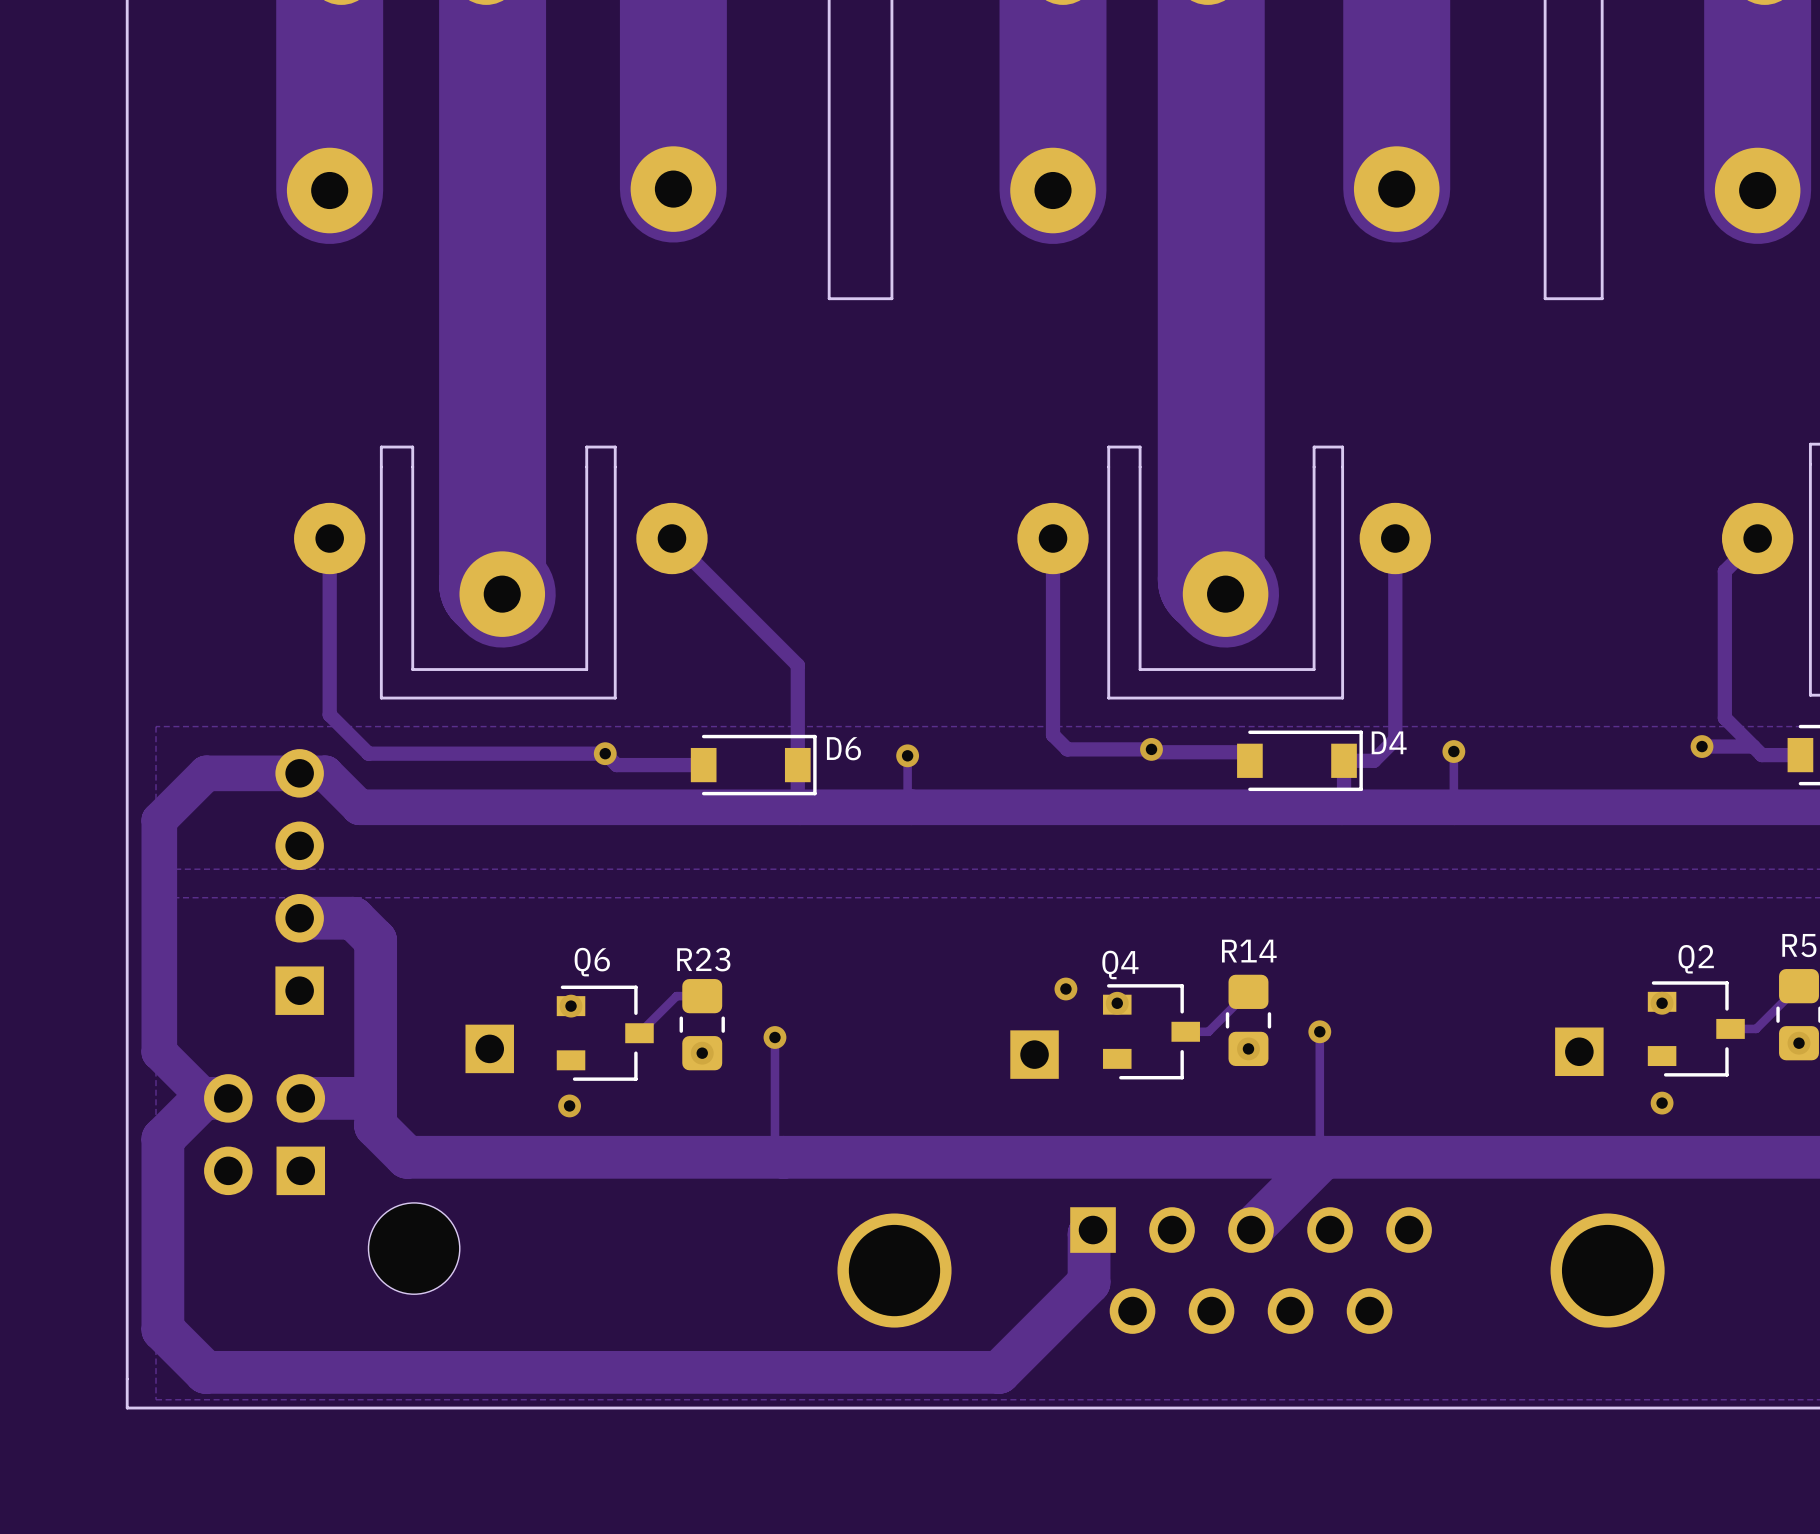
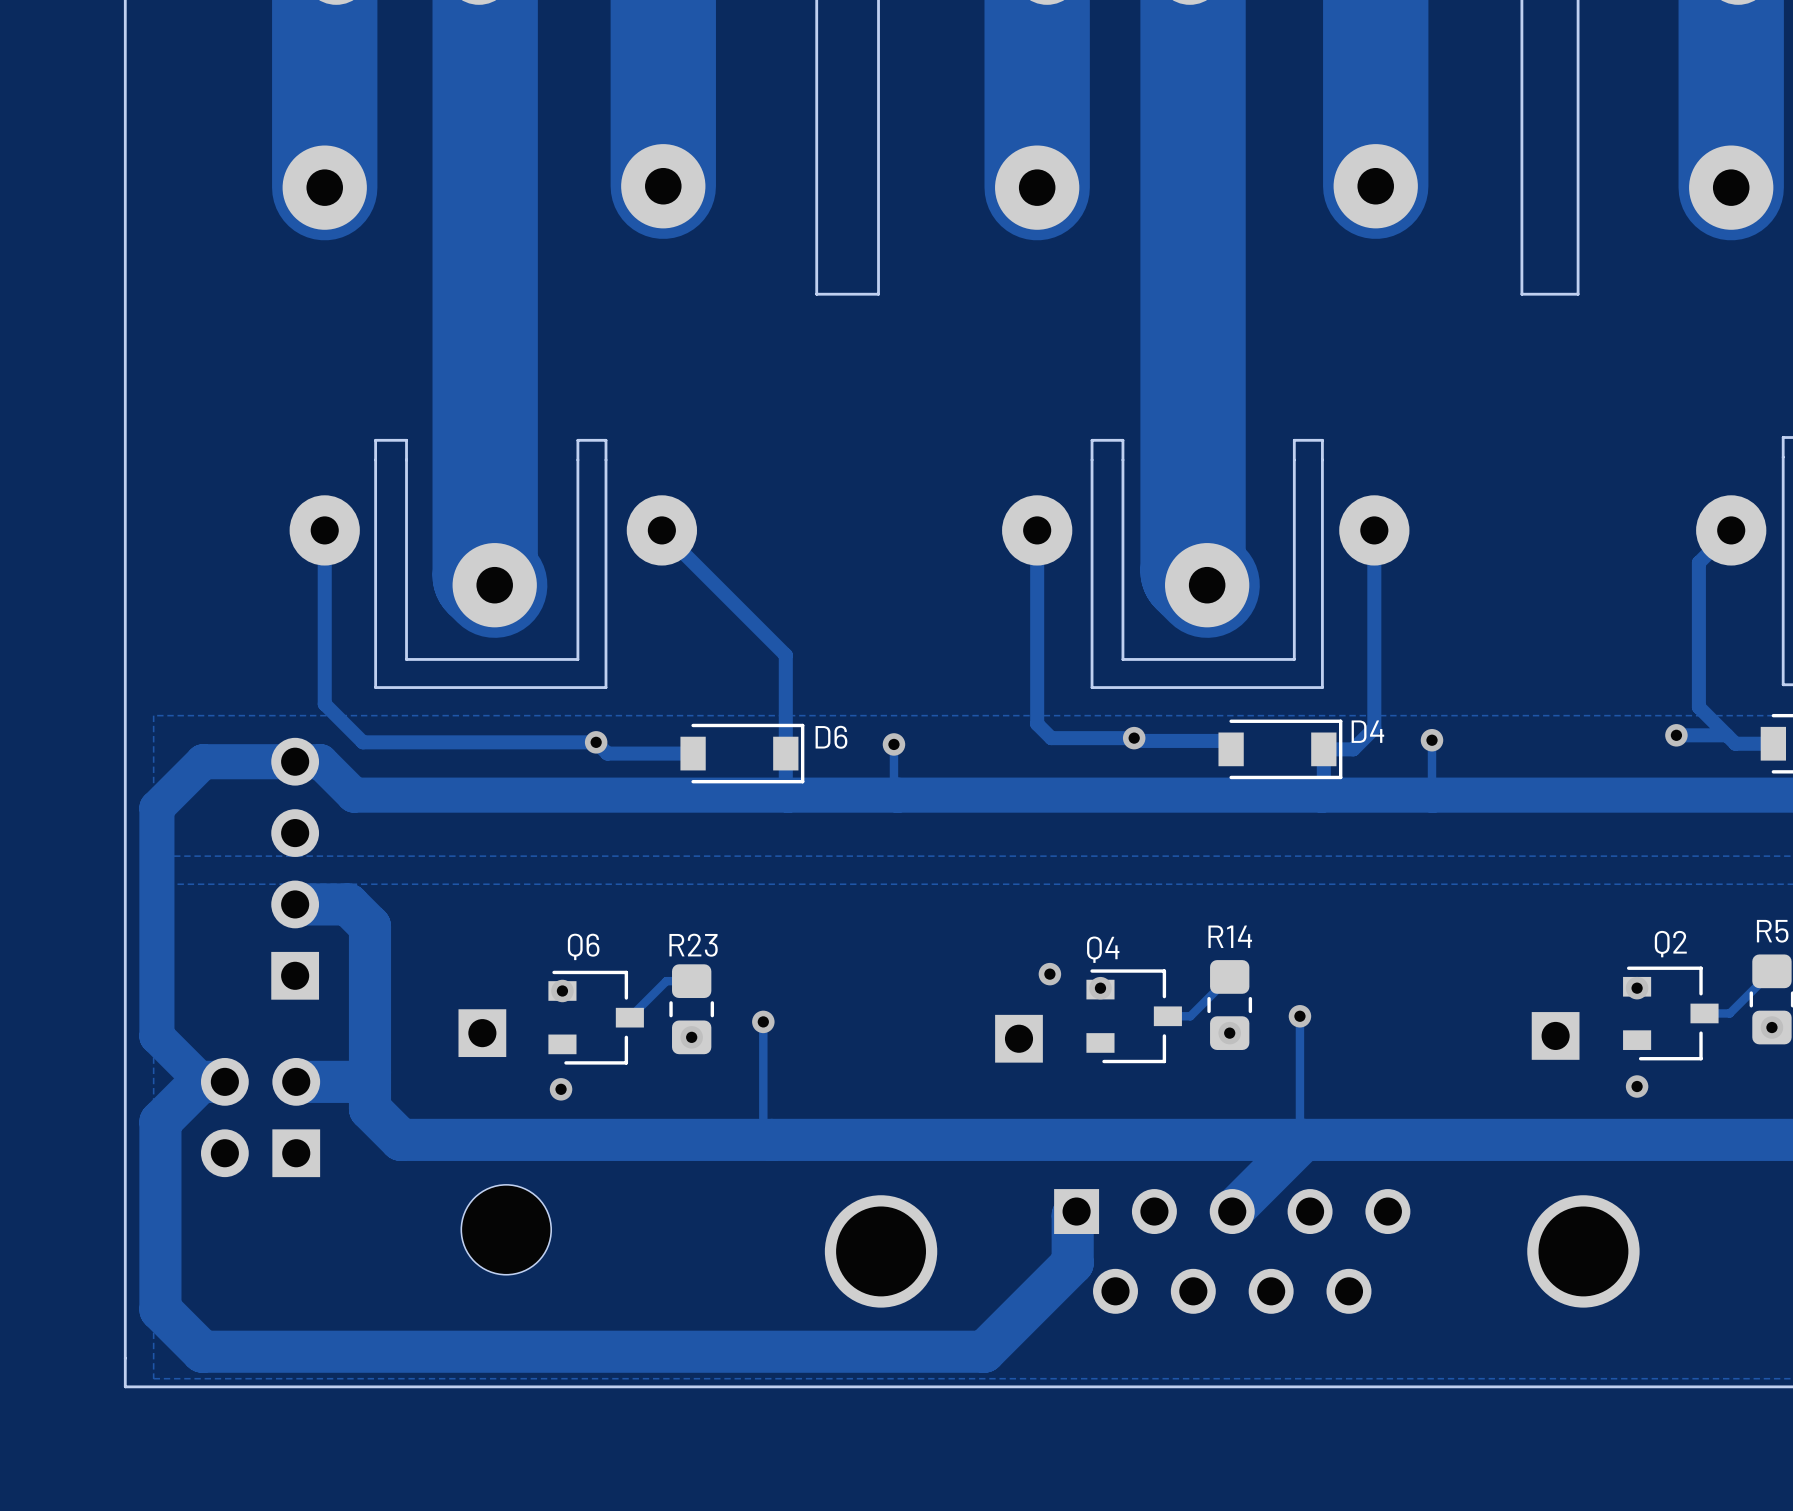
part position: (414, 1248) -> (506, 1229)

